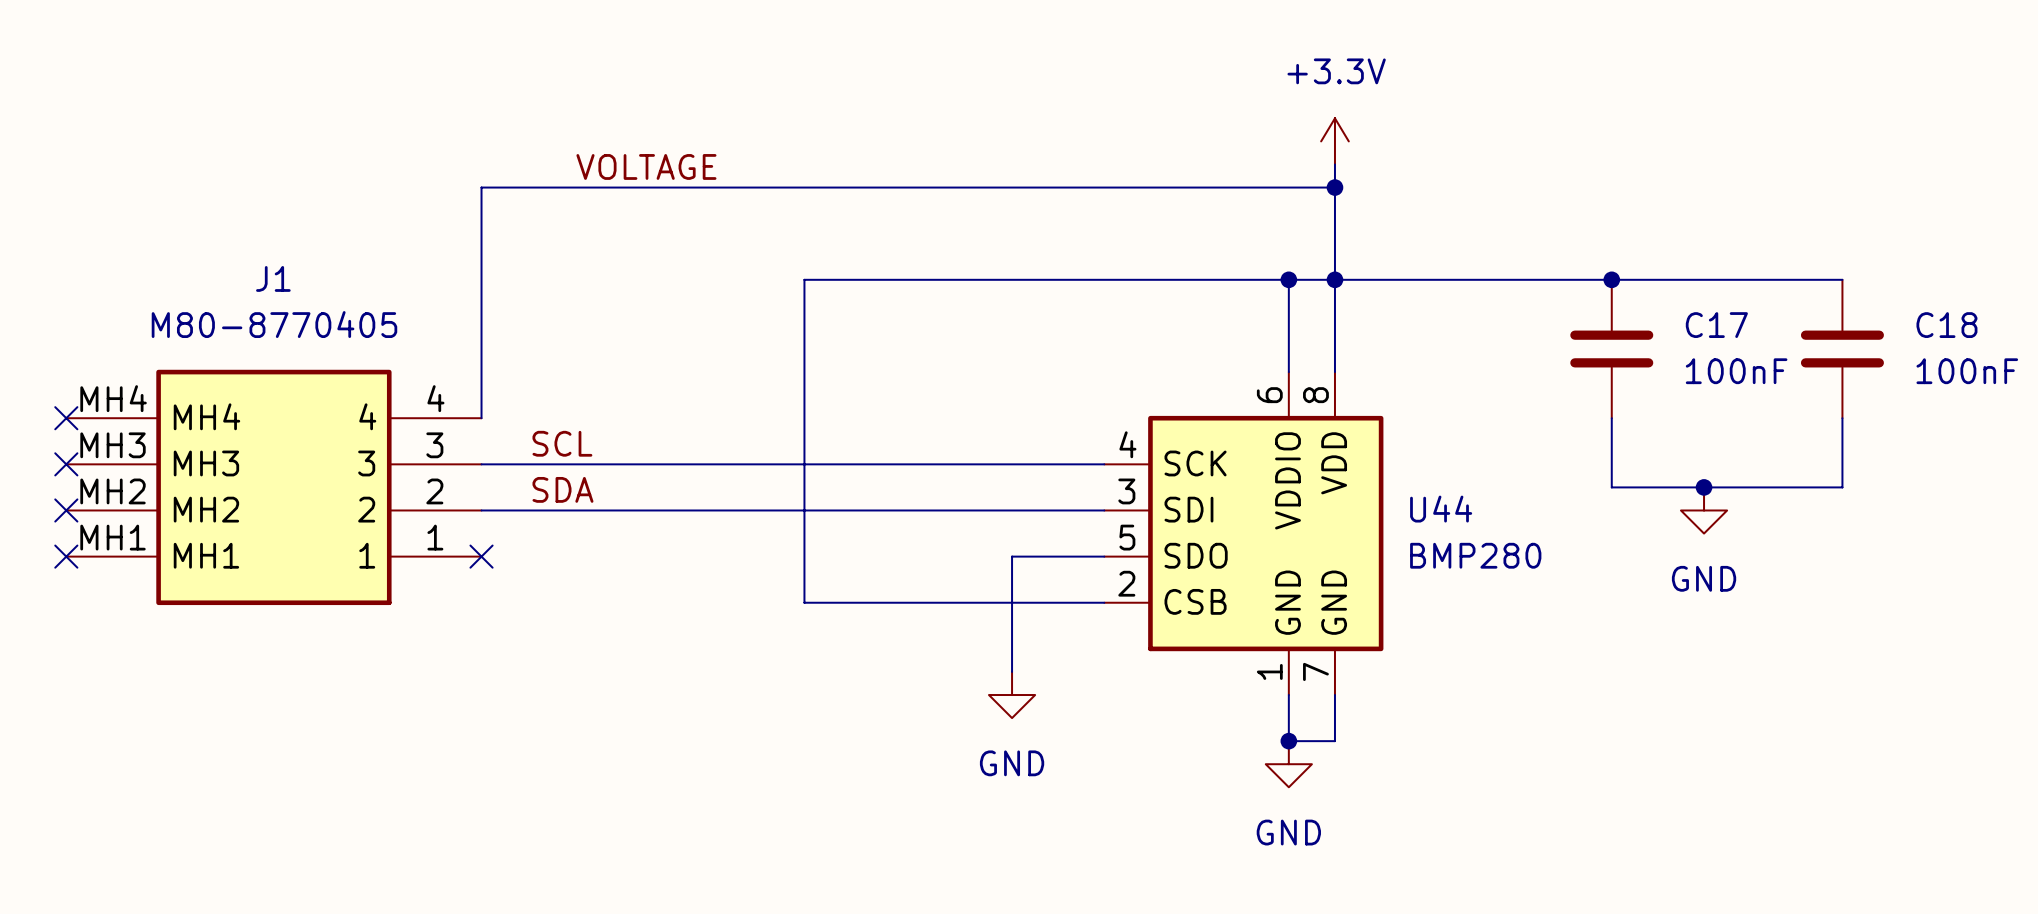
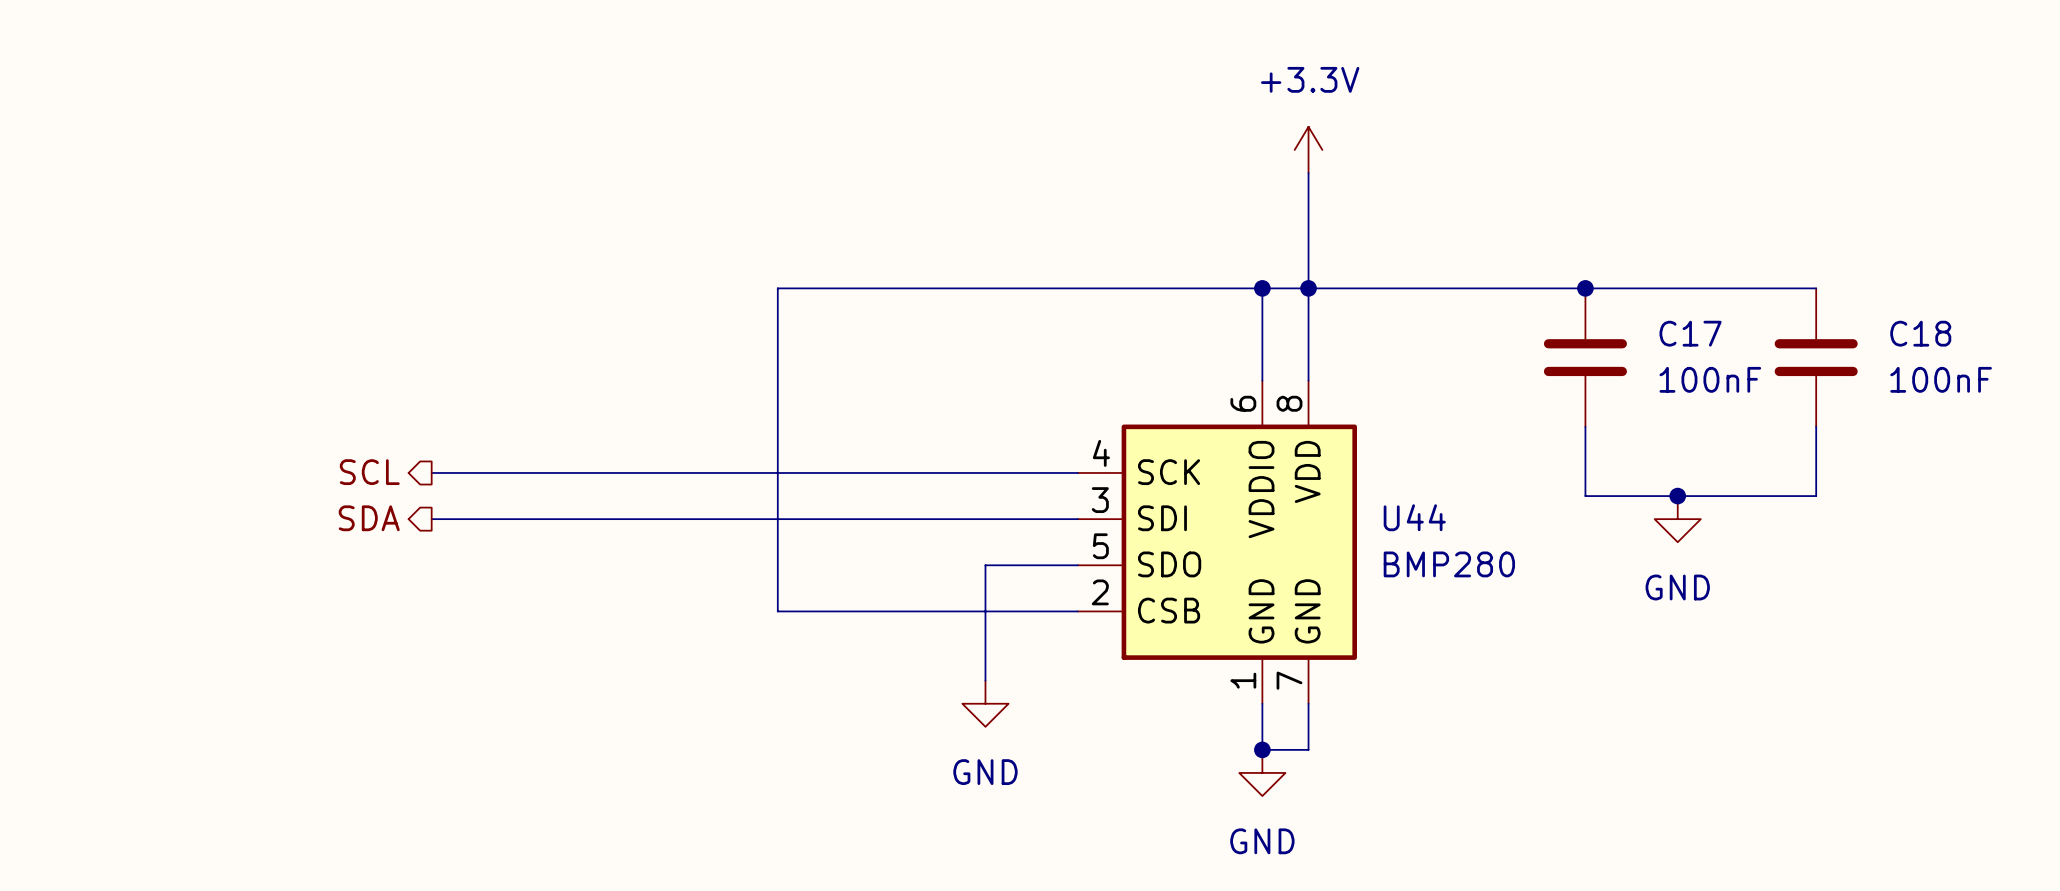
label: VOLTAGE (646, 166) -> none
wire: (1334, 187) (481, 187) (481, 418) -> none
junction: (1334, 187) -> none
no-connect mark: (66, 418) -> none
label: SCL (562, 443) -> none
hierarchical label: none -> SCL (369, 472)
no-connect mark: (66, 464) -> none
J1: M80-8770405 (273, 487) -> none
label: SDA (562, 489) -> none
hierarchical label: none -> SDA (369, 518)
no-connect mark: (66, 510) -> none
no-connect mark: (66, 556) -> none
no-connect mark: (481, 556) -> none

